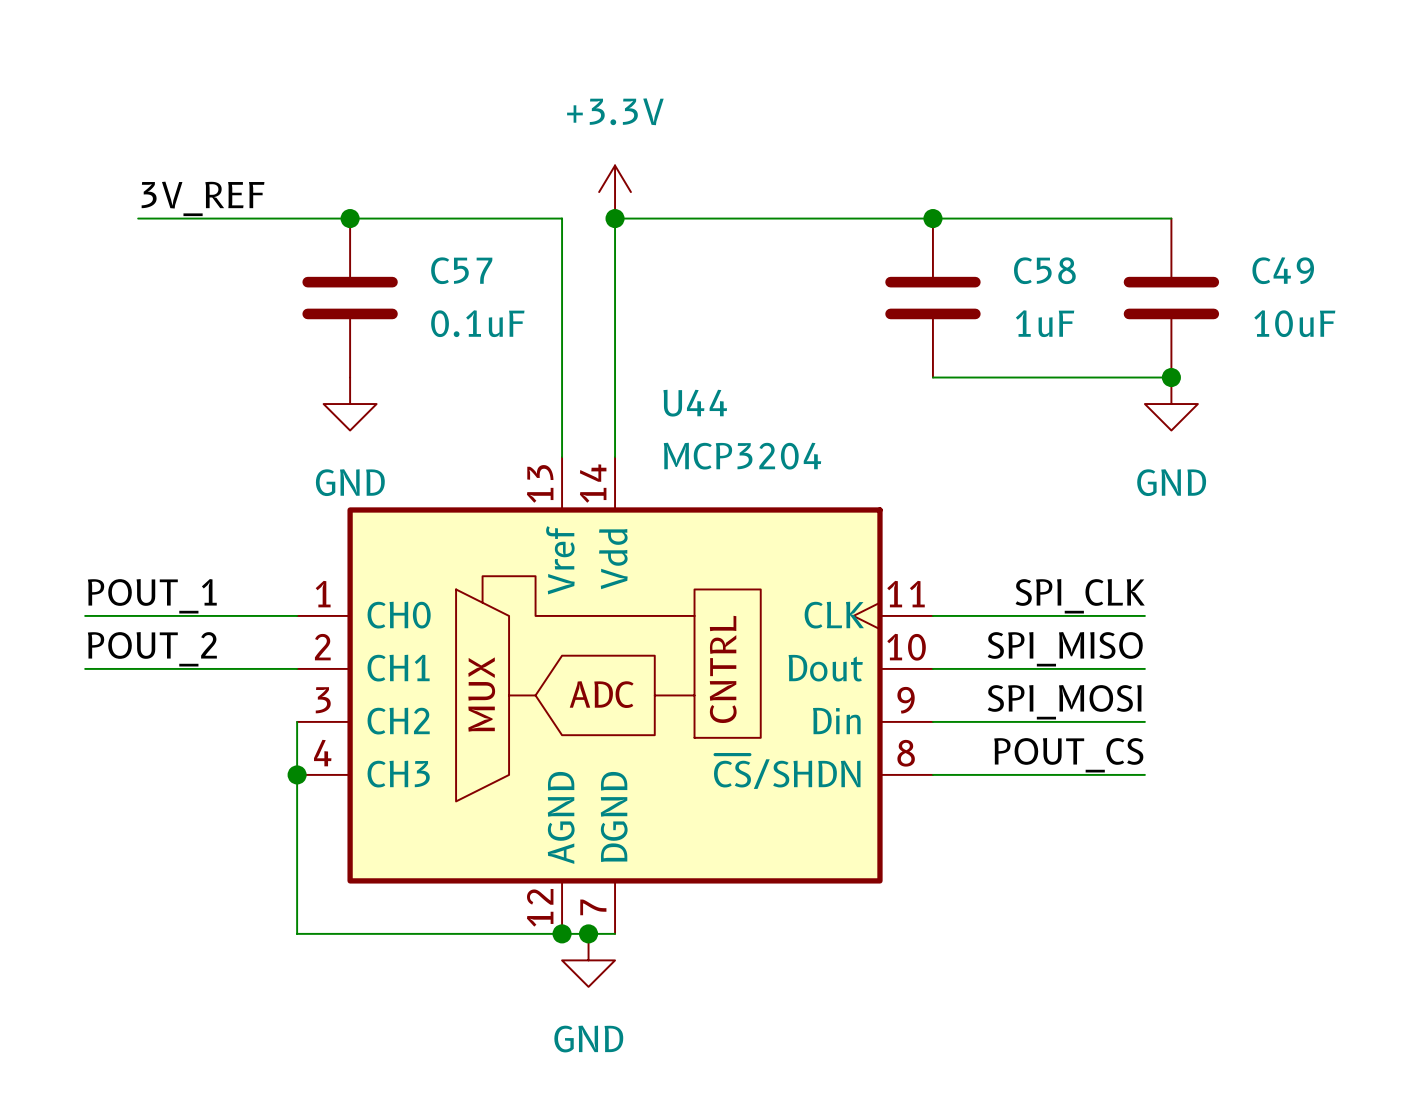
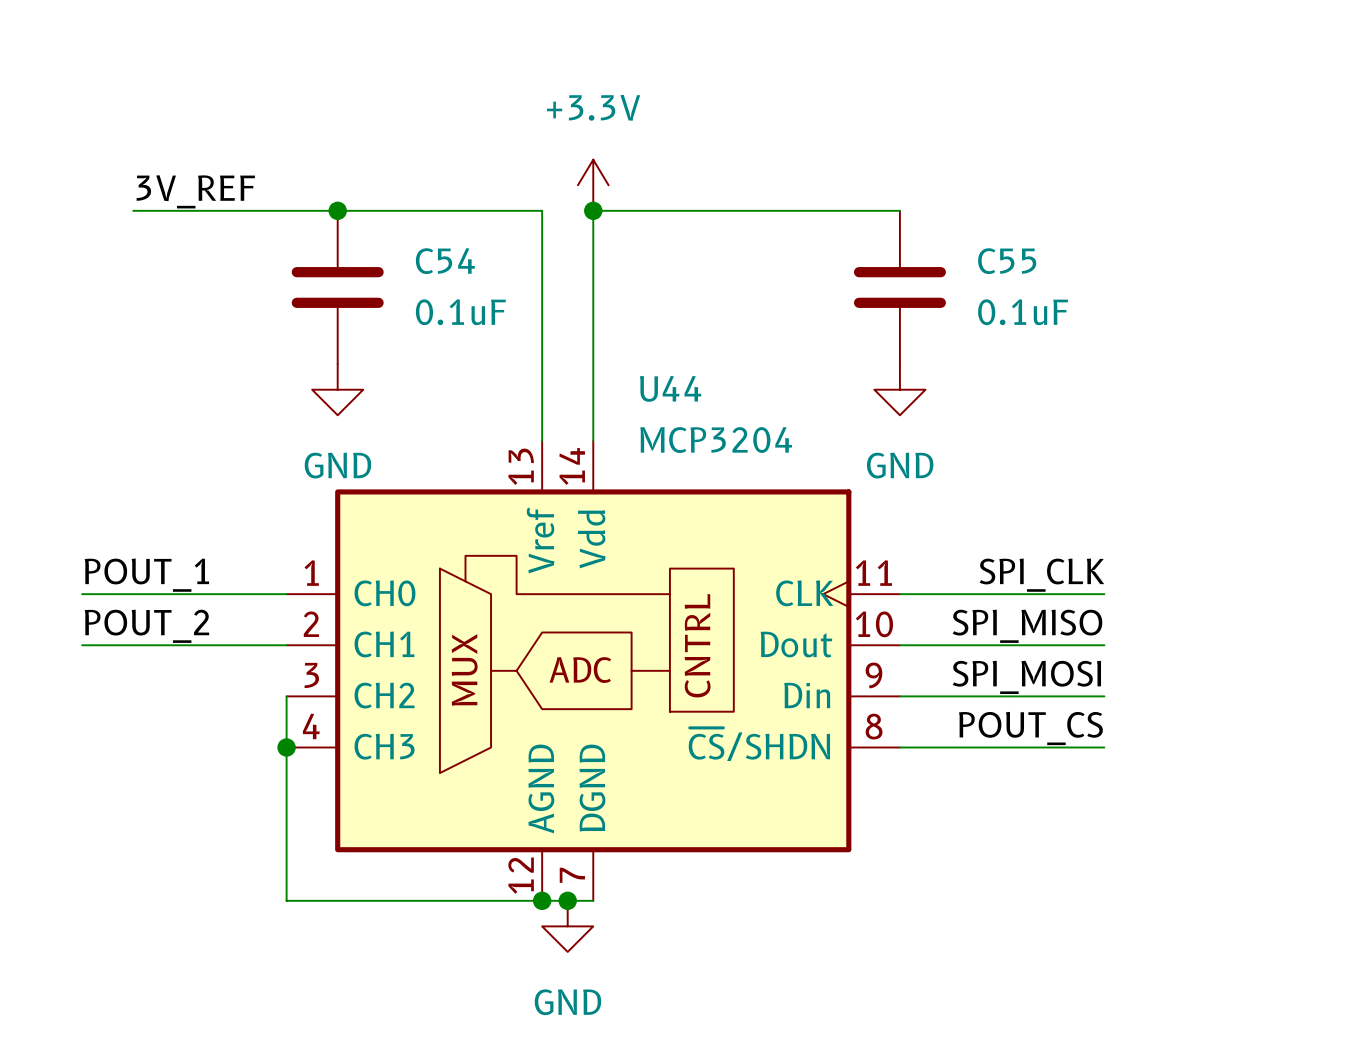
wire: (932, 218) (1171, 218) -> none
junction: (932, 218) -> none
C57 name: C57 (461, 270) -> C54 (445, 261)
C58 name: C58 (1044, 270) -> C55 (1007, 261)
C49: 10uF (1171, 298) -> none
C58 value: 1uF (1045, 323) -> 0.1uF (1023, 312)
wire: (932, 377) (1171, 377) -> none
junction: (1171, 377) -> none
power symbol position: GND (1171, 404) -> GND (899, 389)

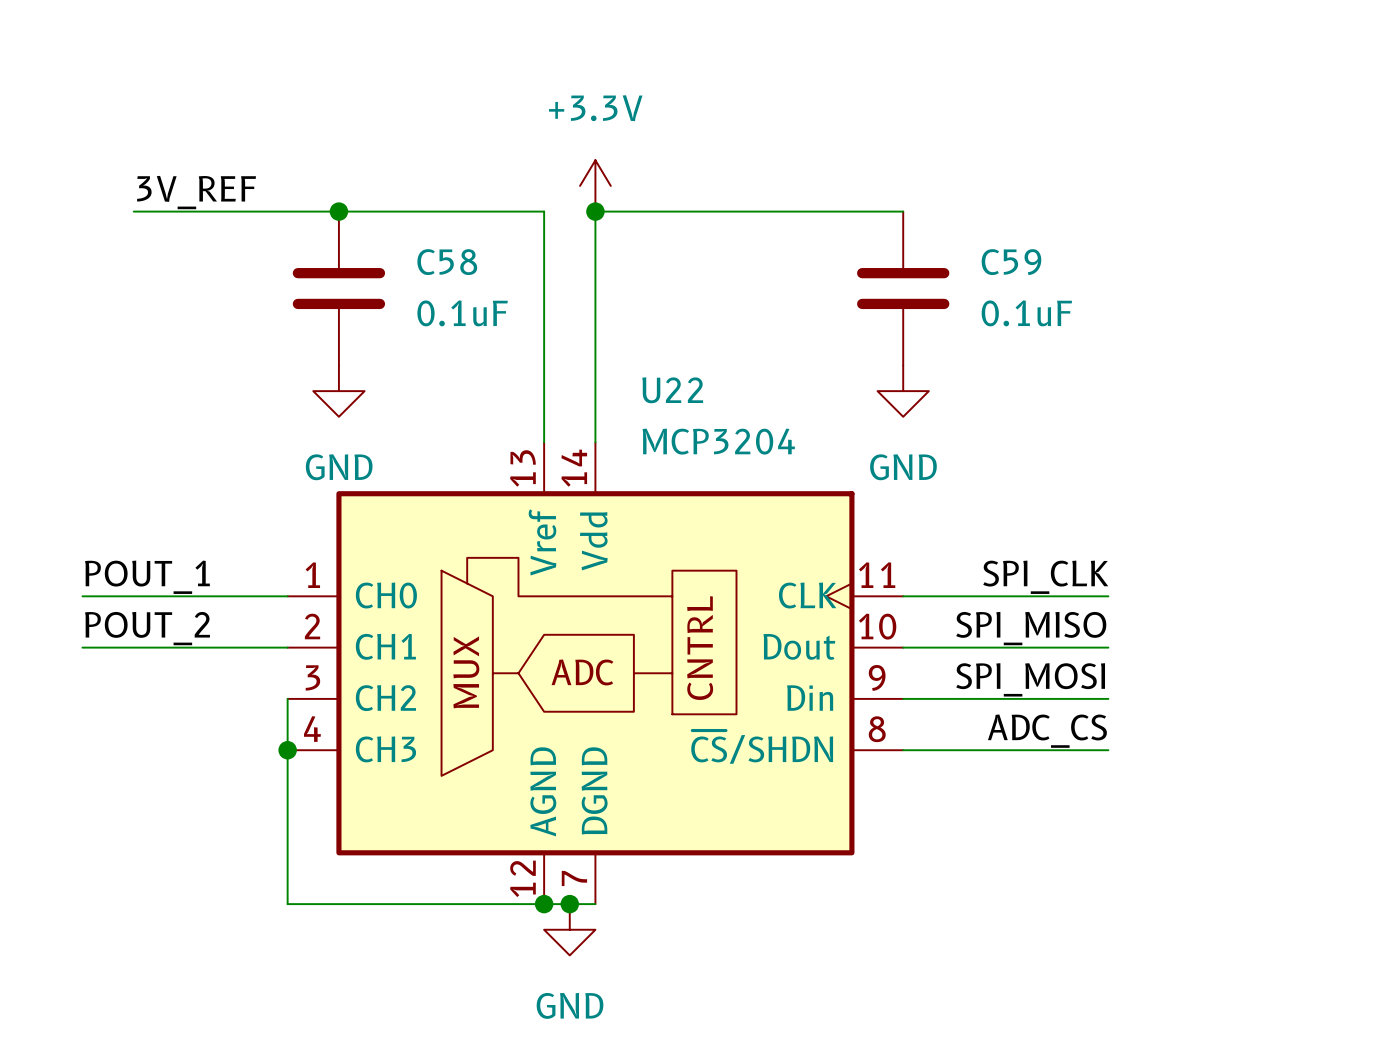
C54 name: C54 (445, 261) -> C58 (447, 262)
C55 name: C55 (1007, 261) -> C59 (1011, 262)
U44 name: U44 (670, 388) -> U22 (672, 390)
label: POUT_CS (1030, 728) -> ADC_CS (1047, 731)

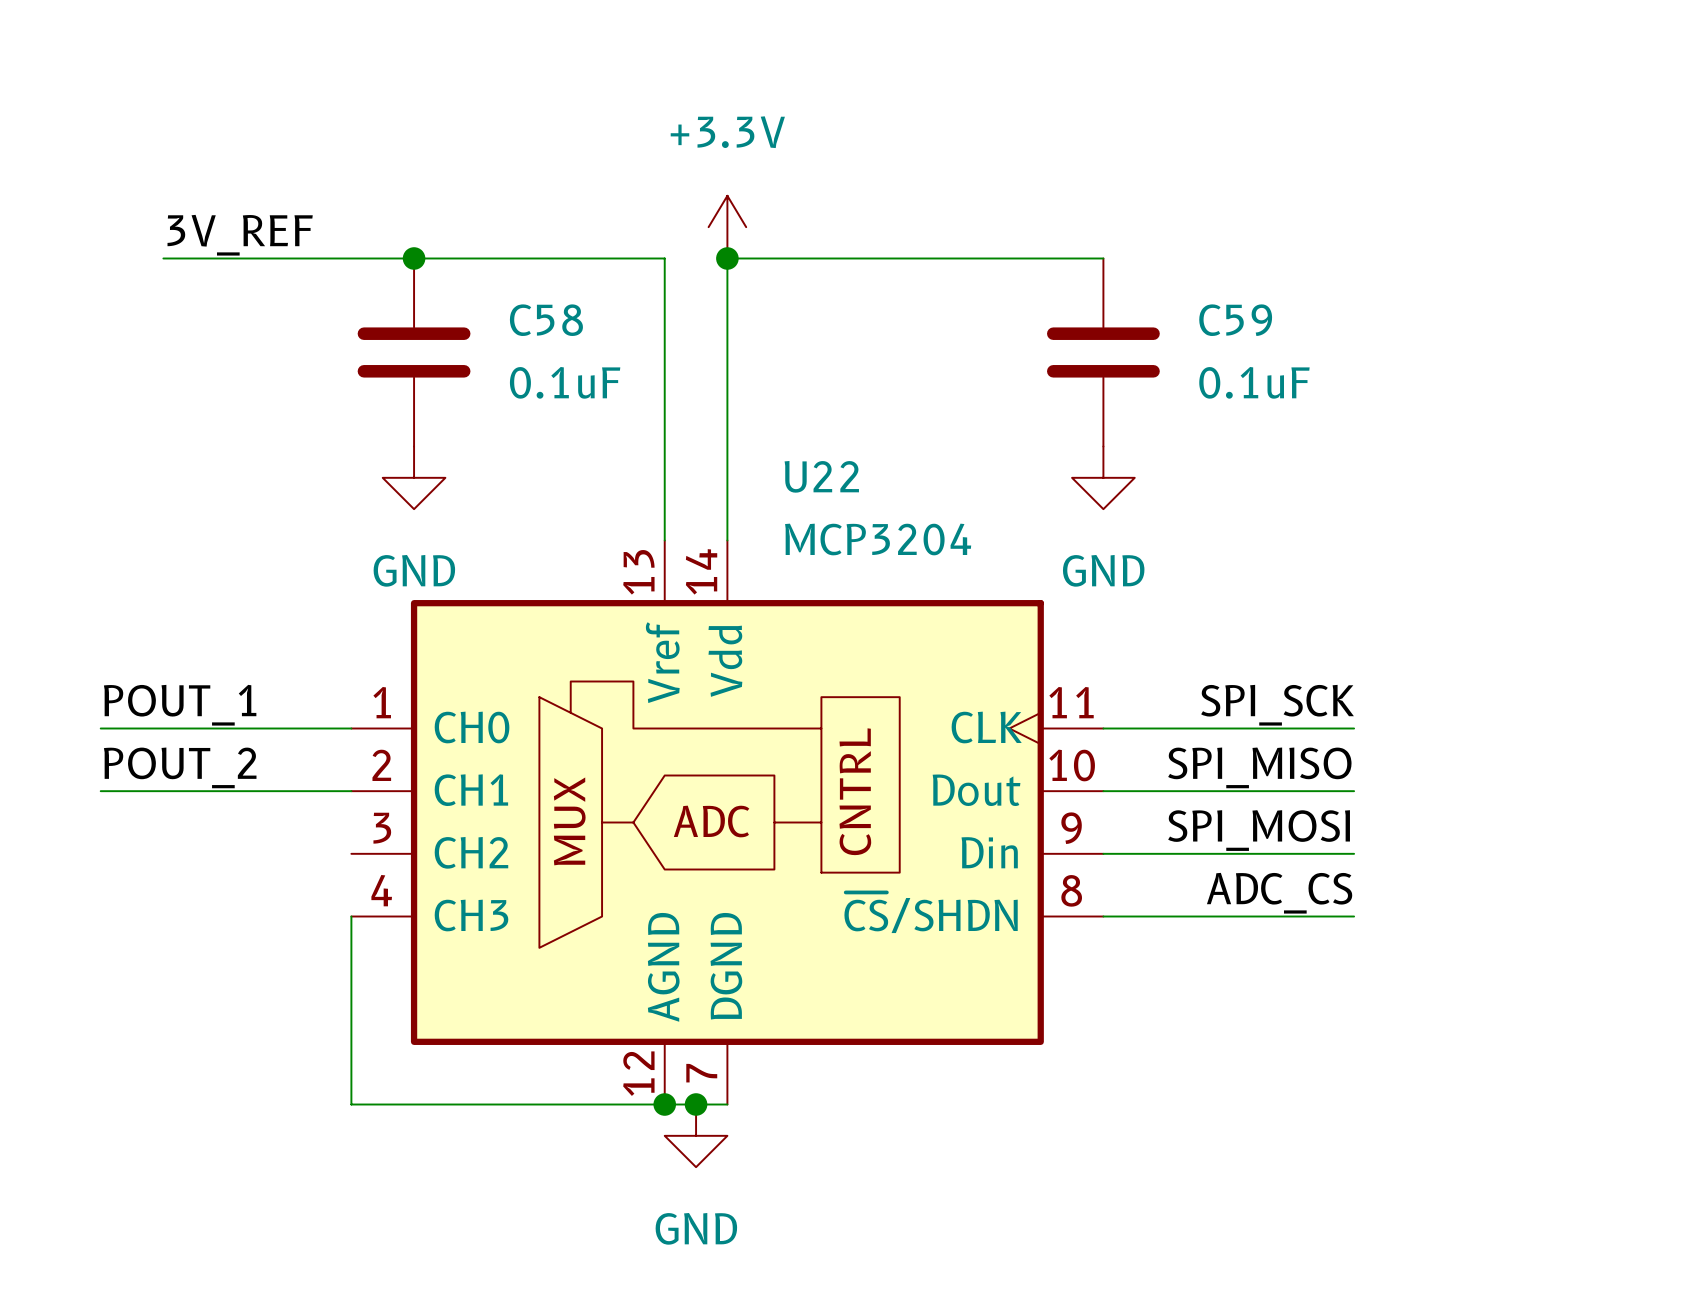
label: SPI_CLK (1045, 577) -> SPI_SCK (1277, 705)
wire: (287, 698) (287, 750) -> none
junction: (287, 750) -> none

